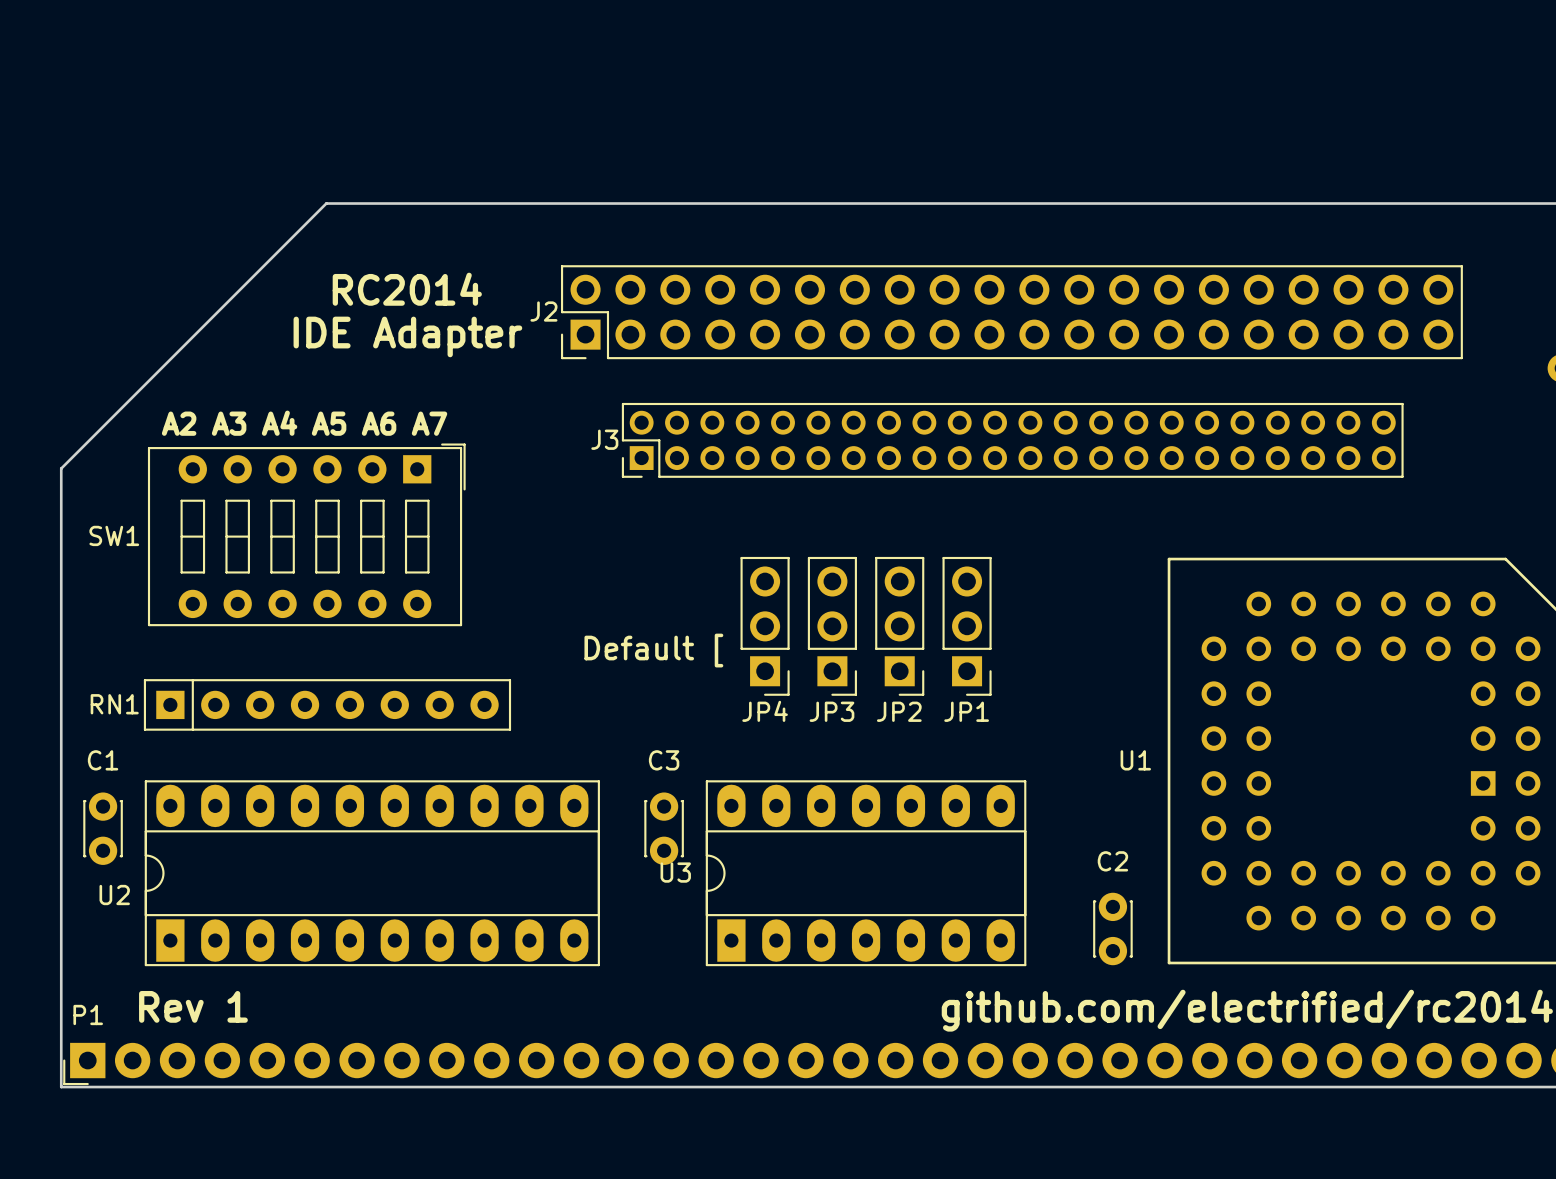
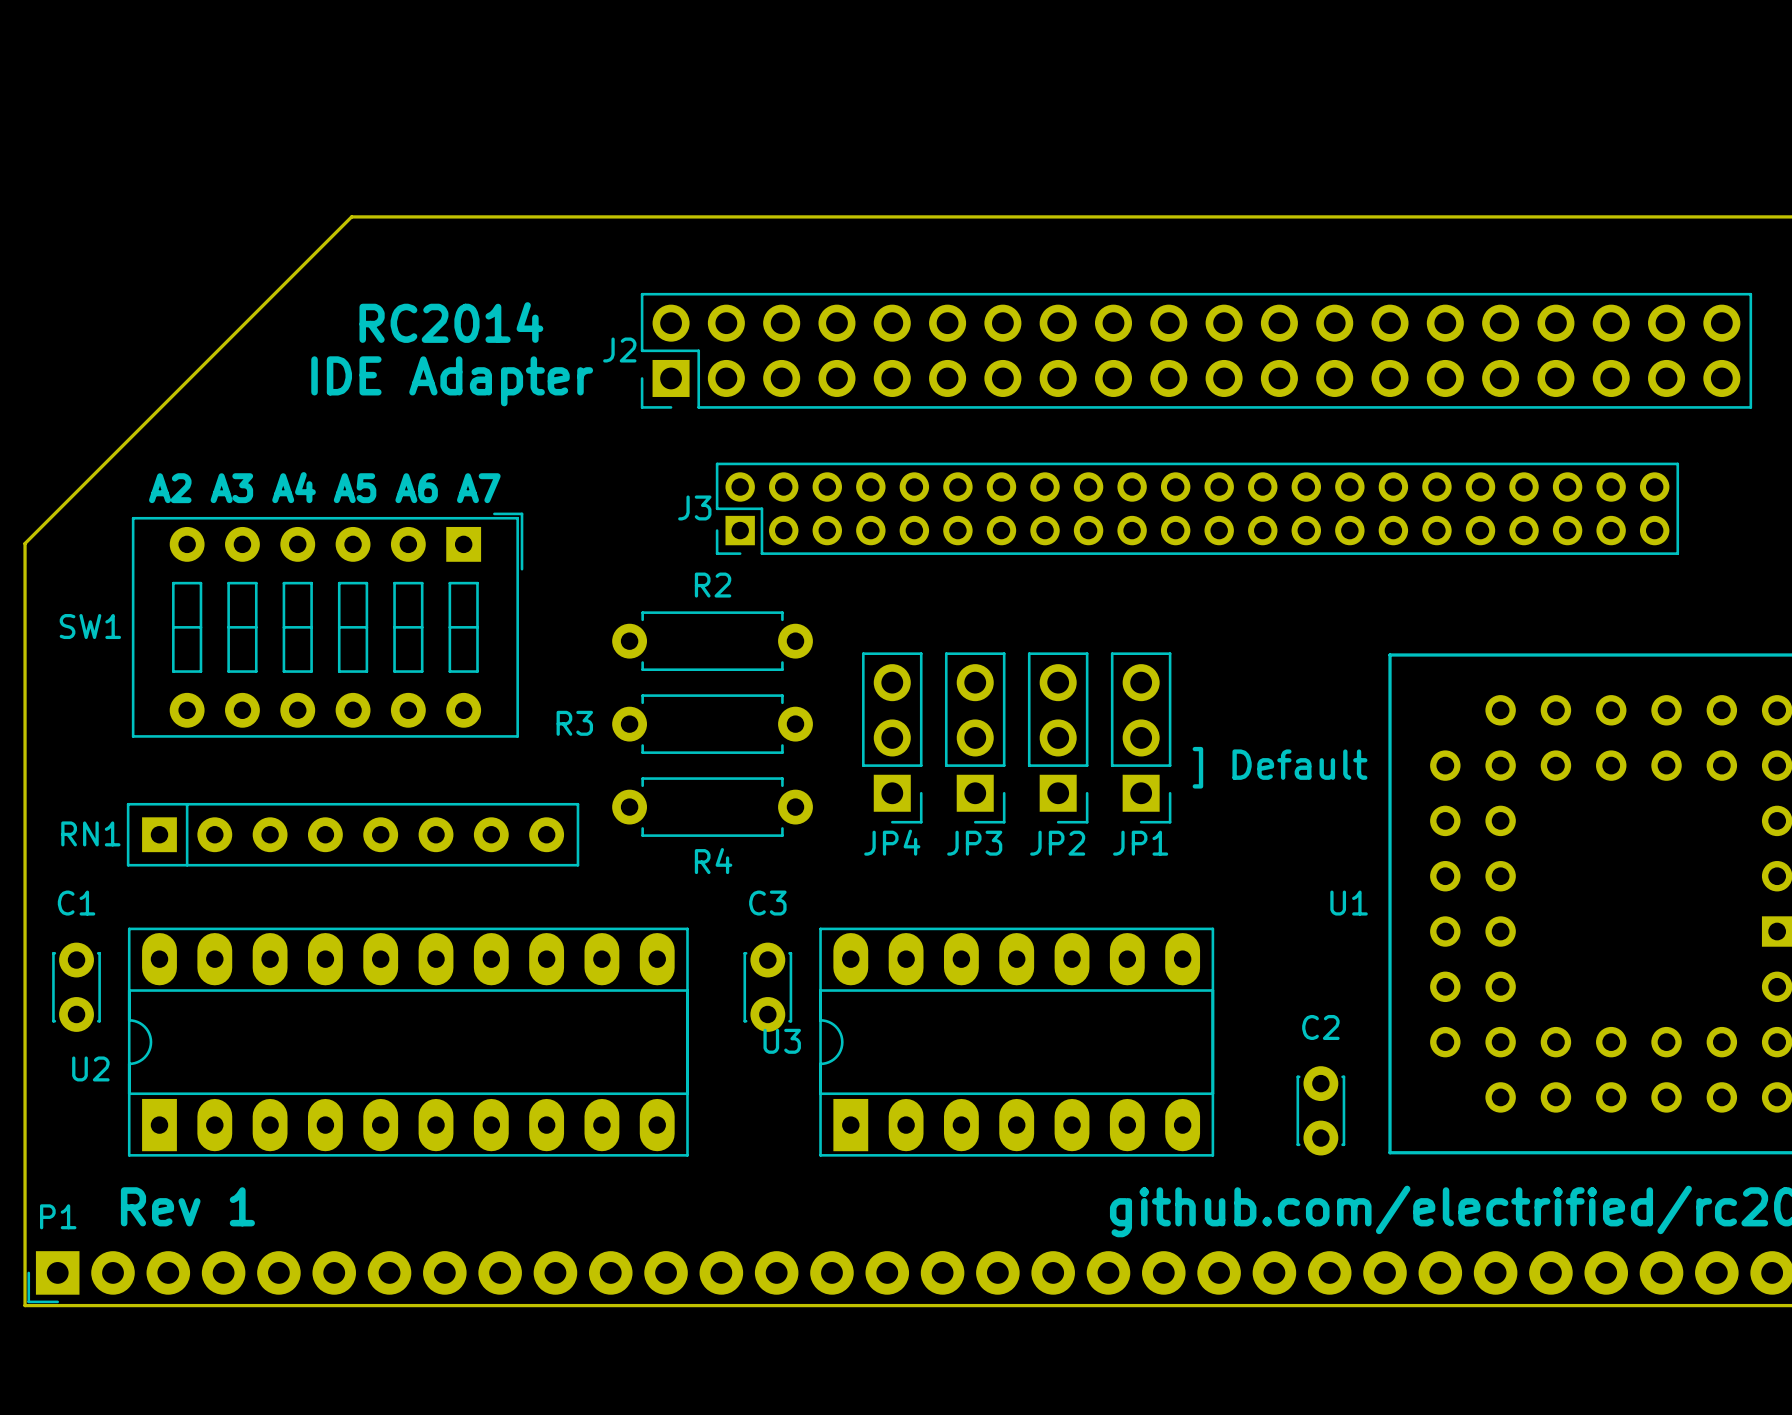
R2: none -> (712, 641)
R3: none -> (712, 724)
text: Default [ (653, 650) -> none
text: none -> ] Default (1280, 767)
R4: none -> (712, 807)

